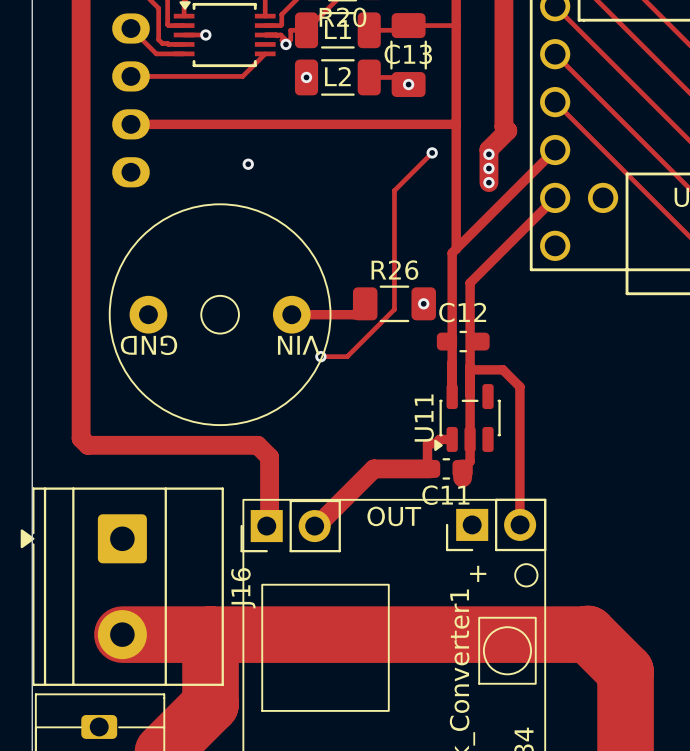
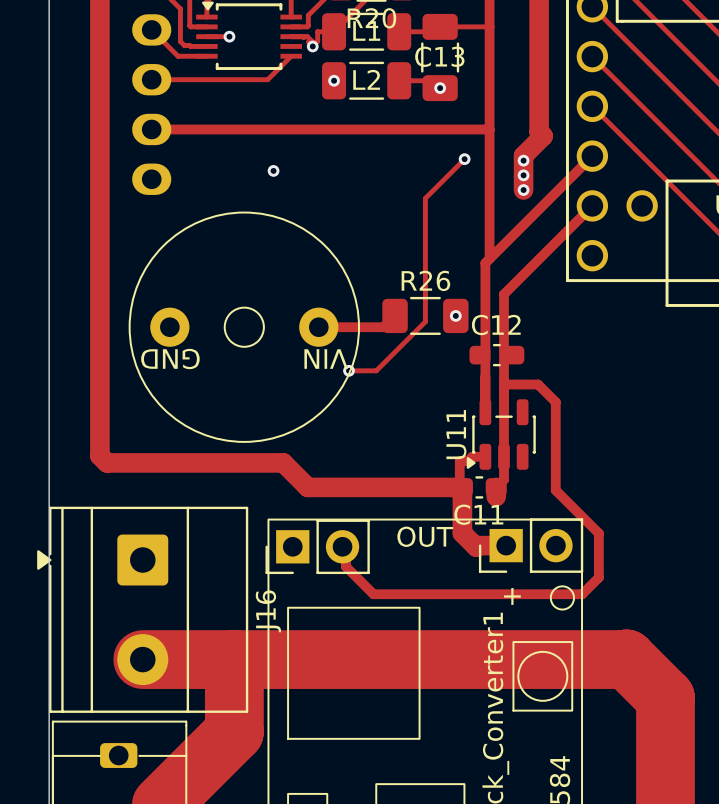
track: (269, 457) (269, 525) -> none
track: (373, 468) (317, 525) -> (404, 487) (307, 487) (295, 475)
track: none -> (462, 487) (462, 533) (476, 547) (506, 545)
track: (519, 471) (519, 525) -> (555, 490) (598, 533) (598, 577) (582, 594) (373, 594) (346, 566) (346, 550) (342, 546)

